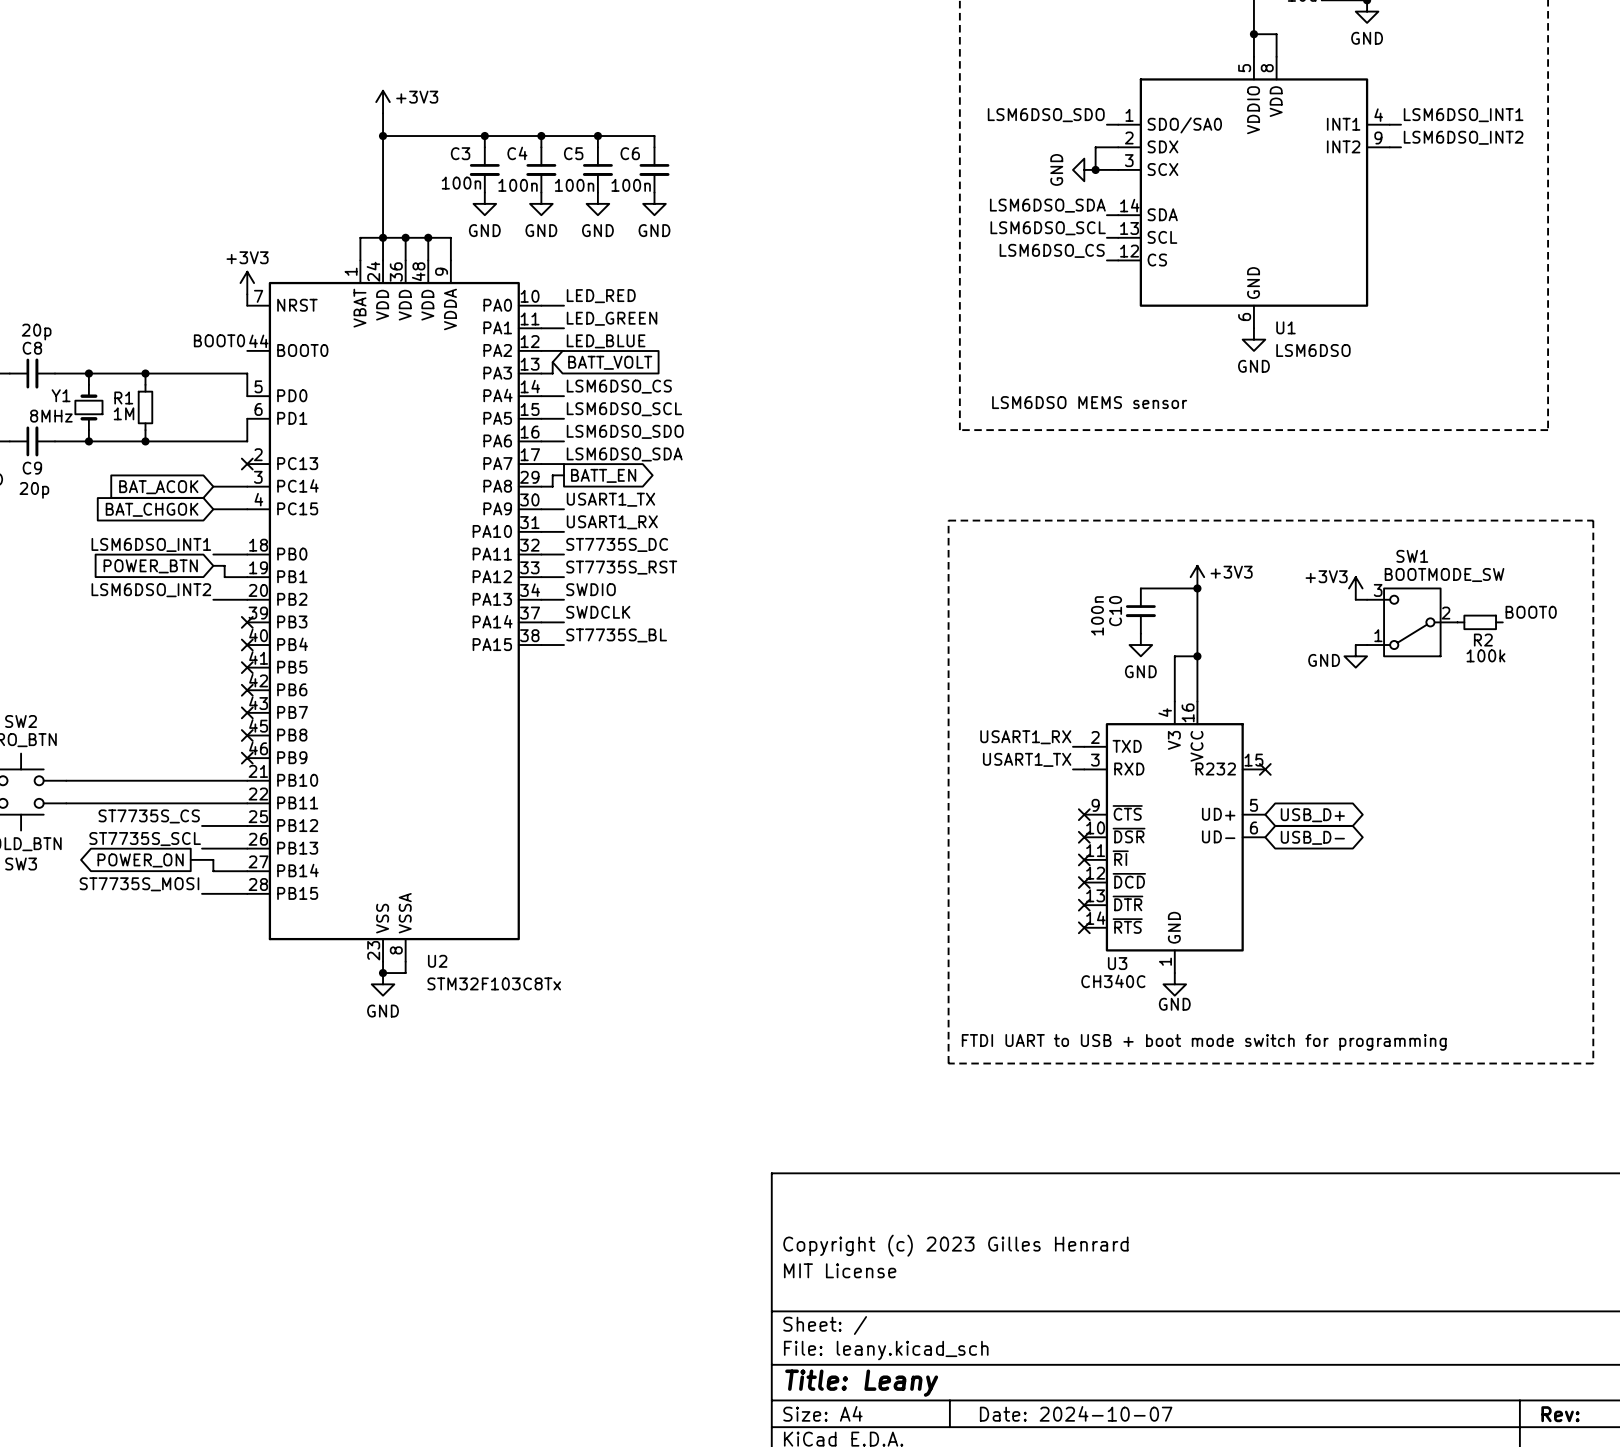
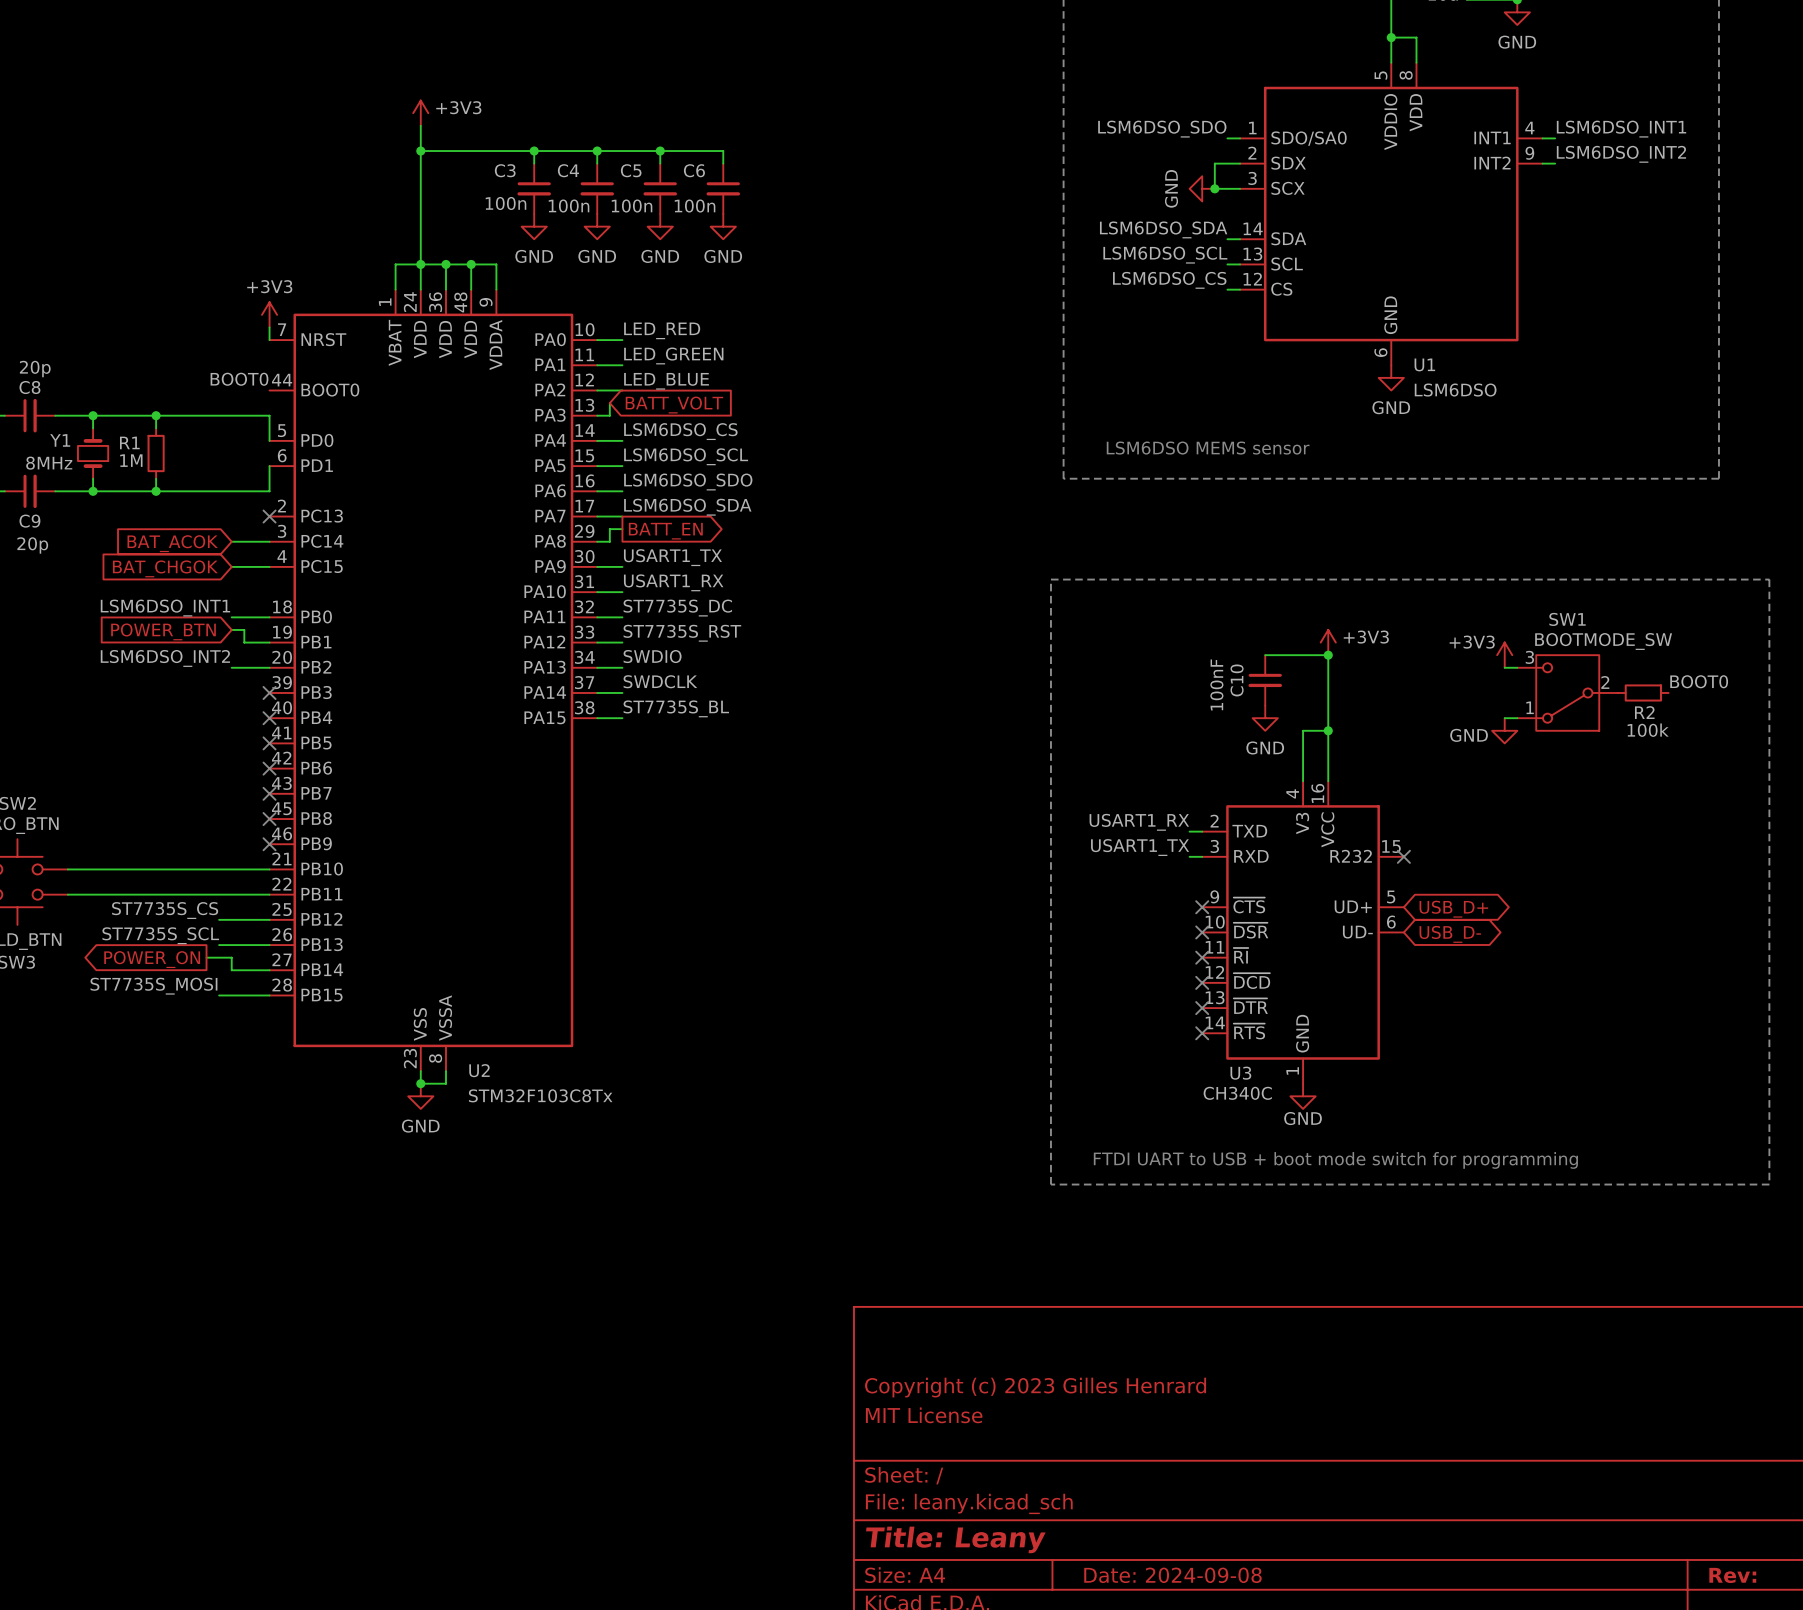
C10 value: 100n (1097, 615) -> 100nF (1216, 684)
title block: Date: 2024-10-07 (1076, 1413) -> Date: 2024-09-08 (1172, 1575)

